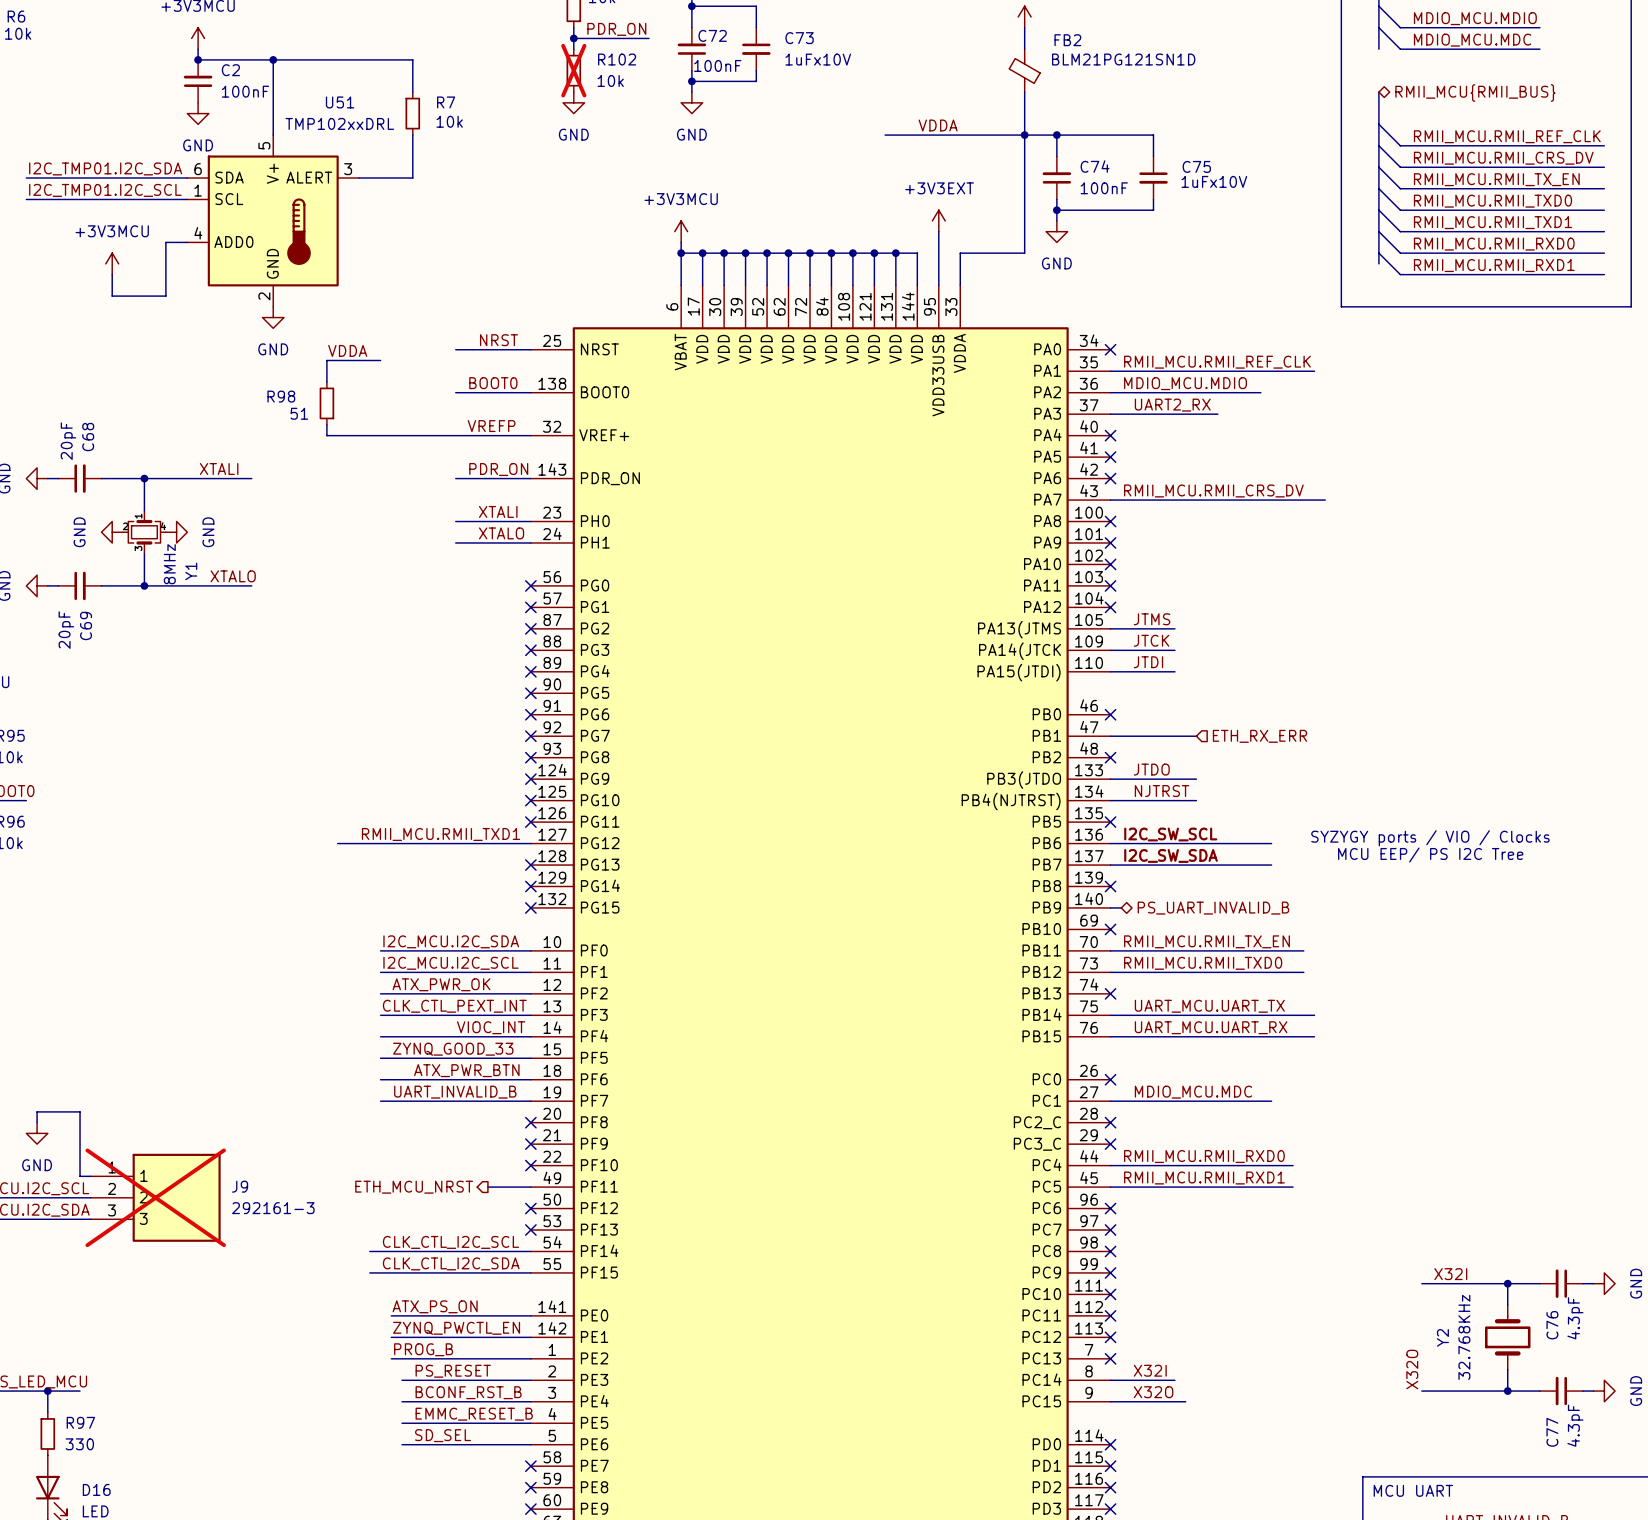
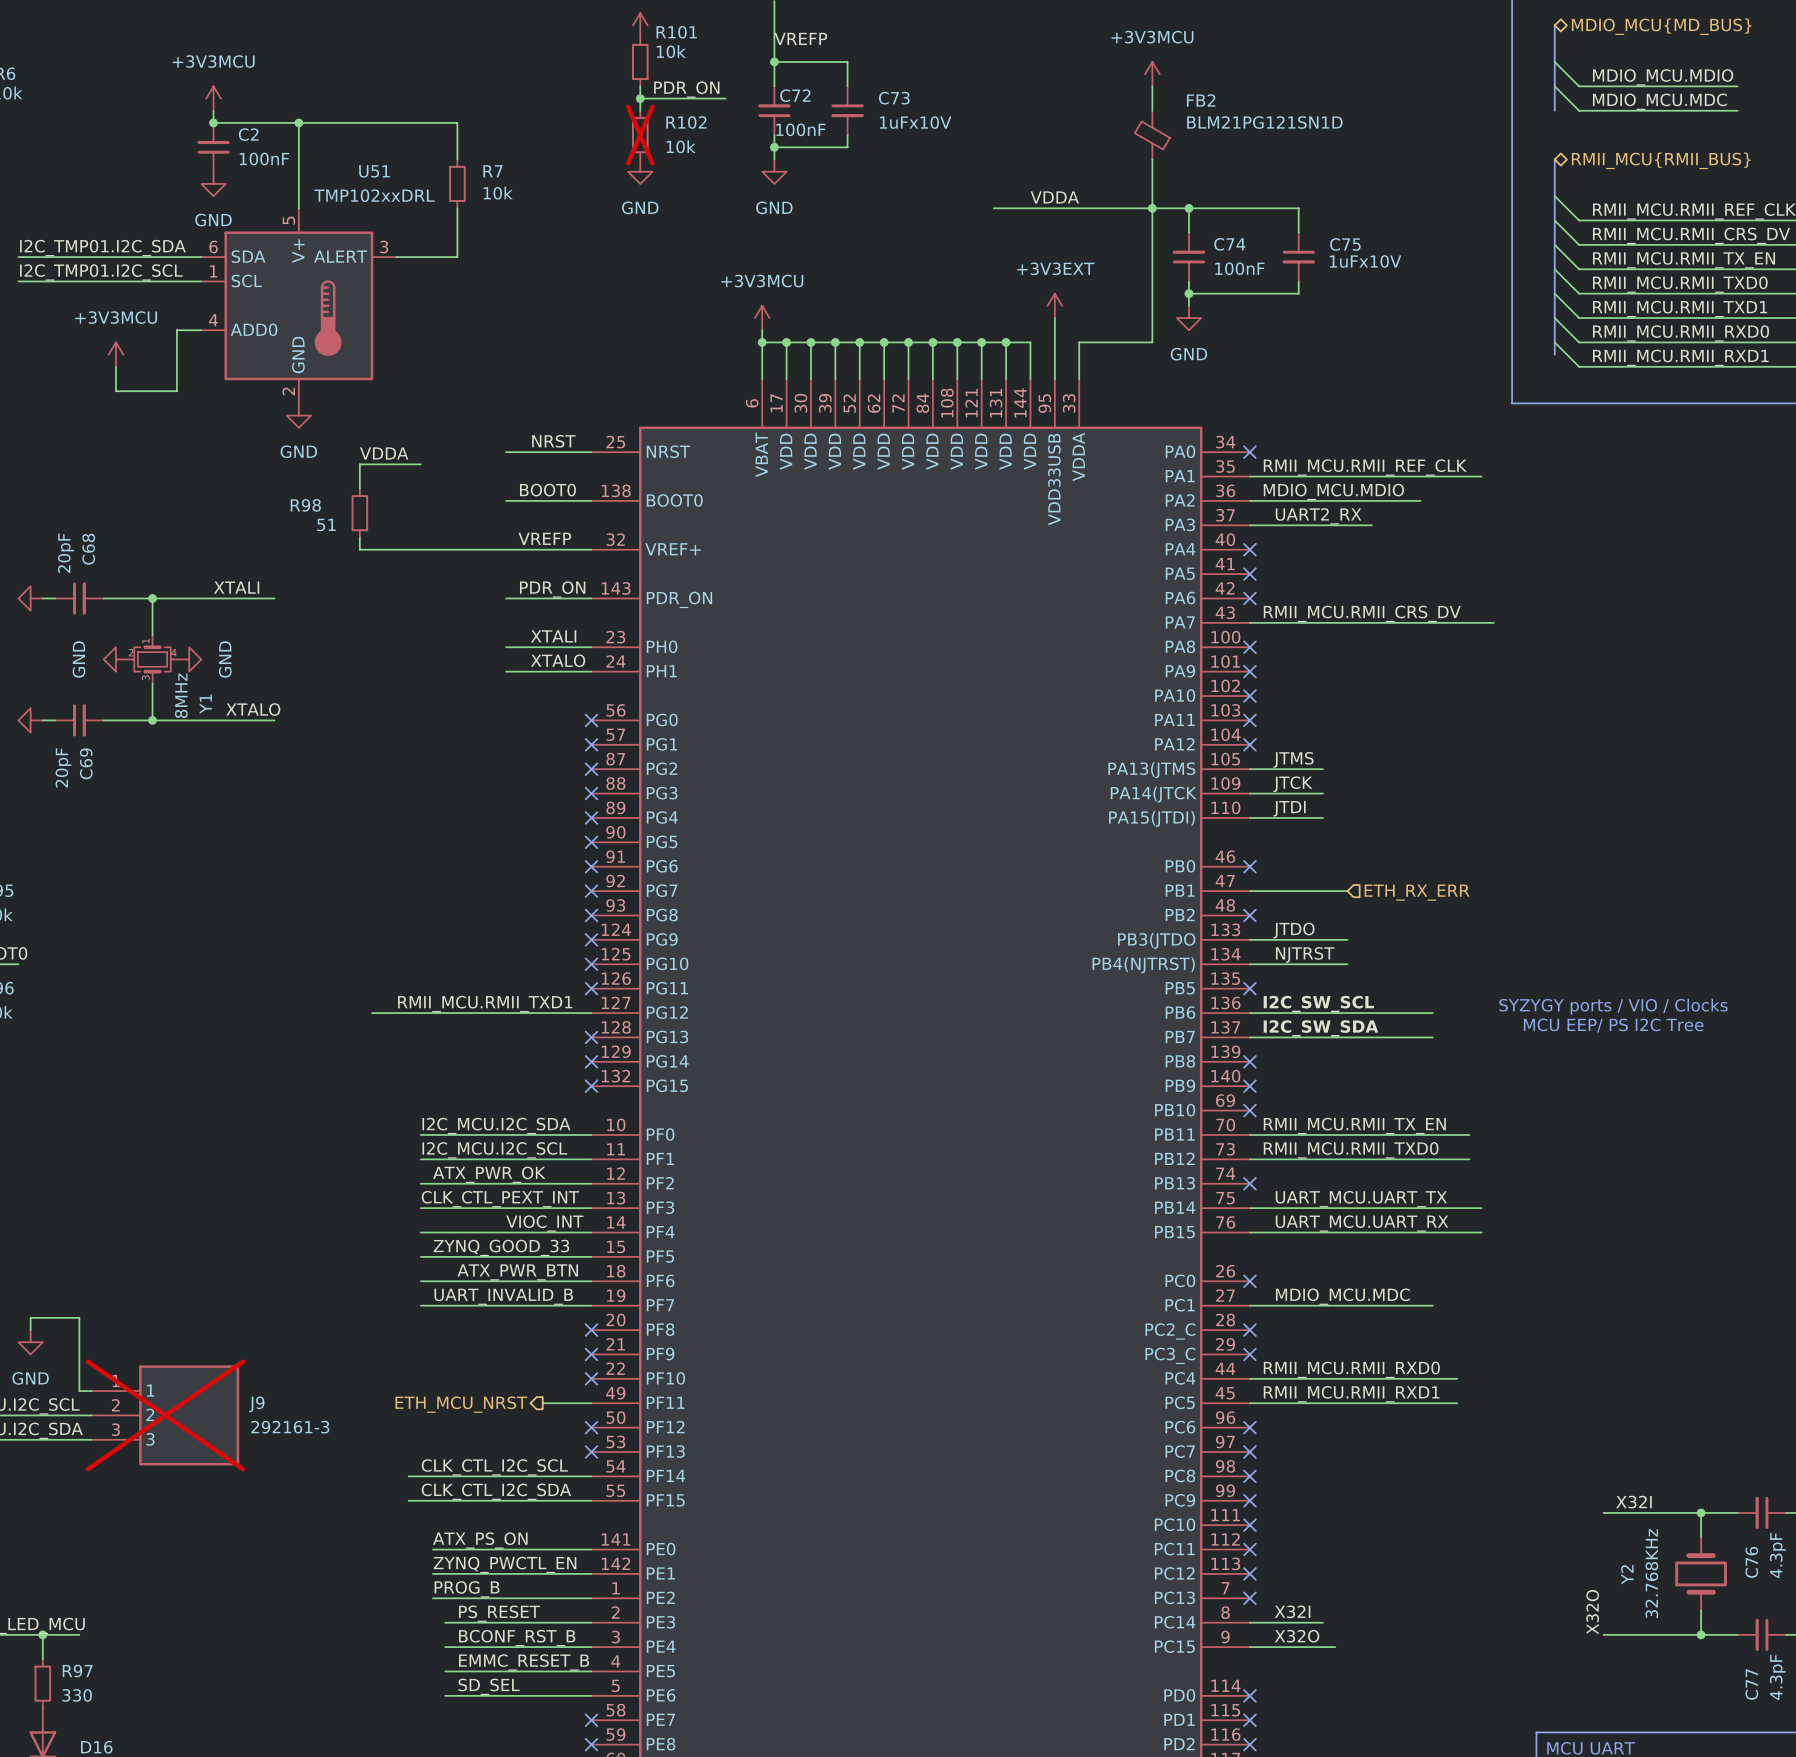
wire: (1110, 907) (1121, 907) -> none
no-connect mark: none -> (1249, 1086)
hierarchical label: PS_UART_INVALID_B (1213, 908) -> none

